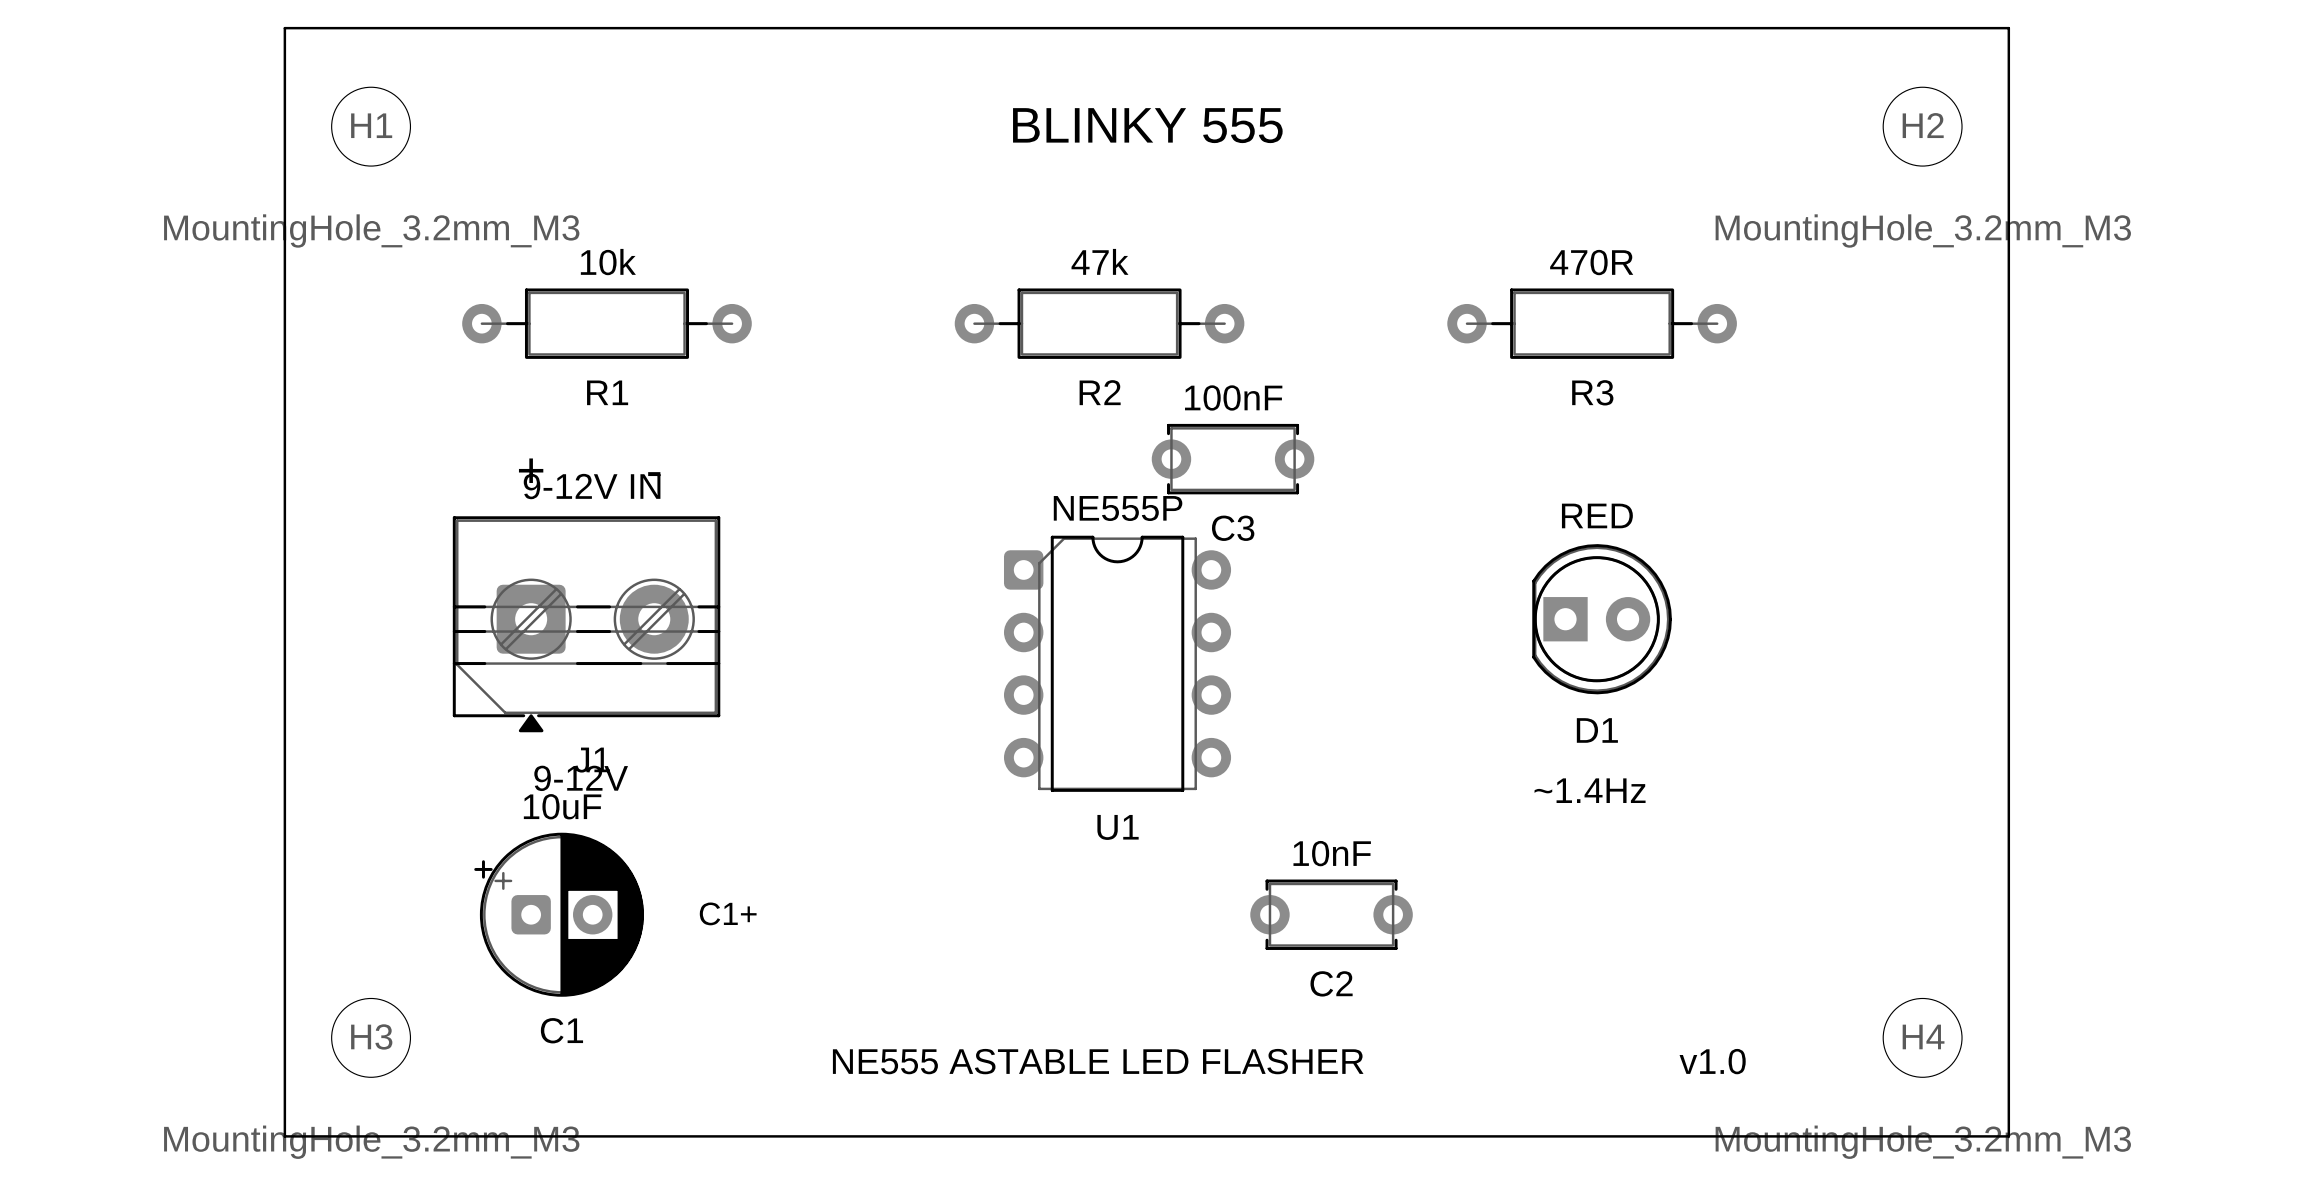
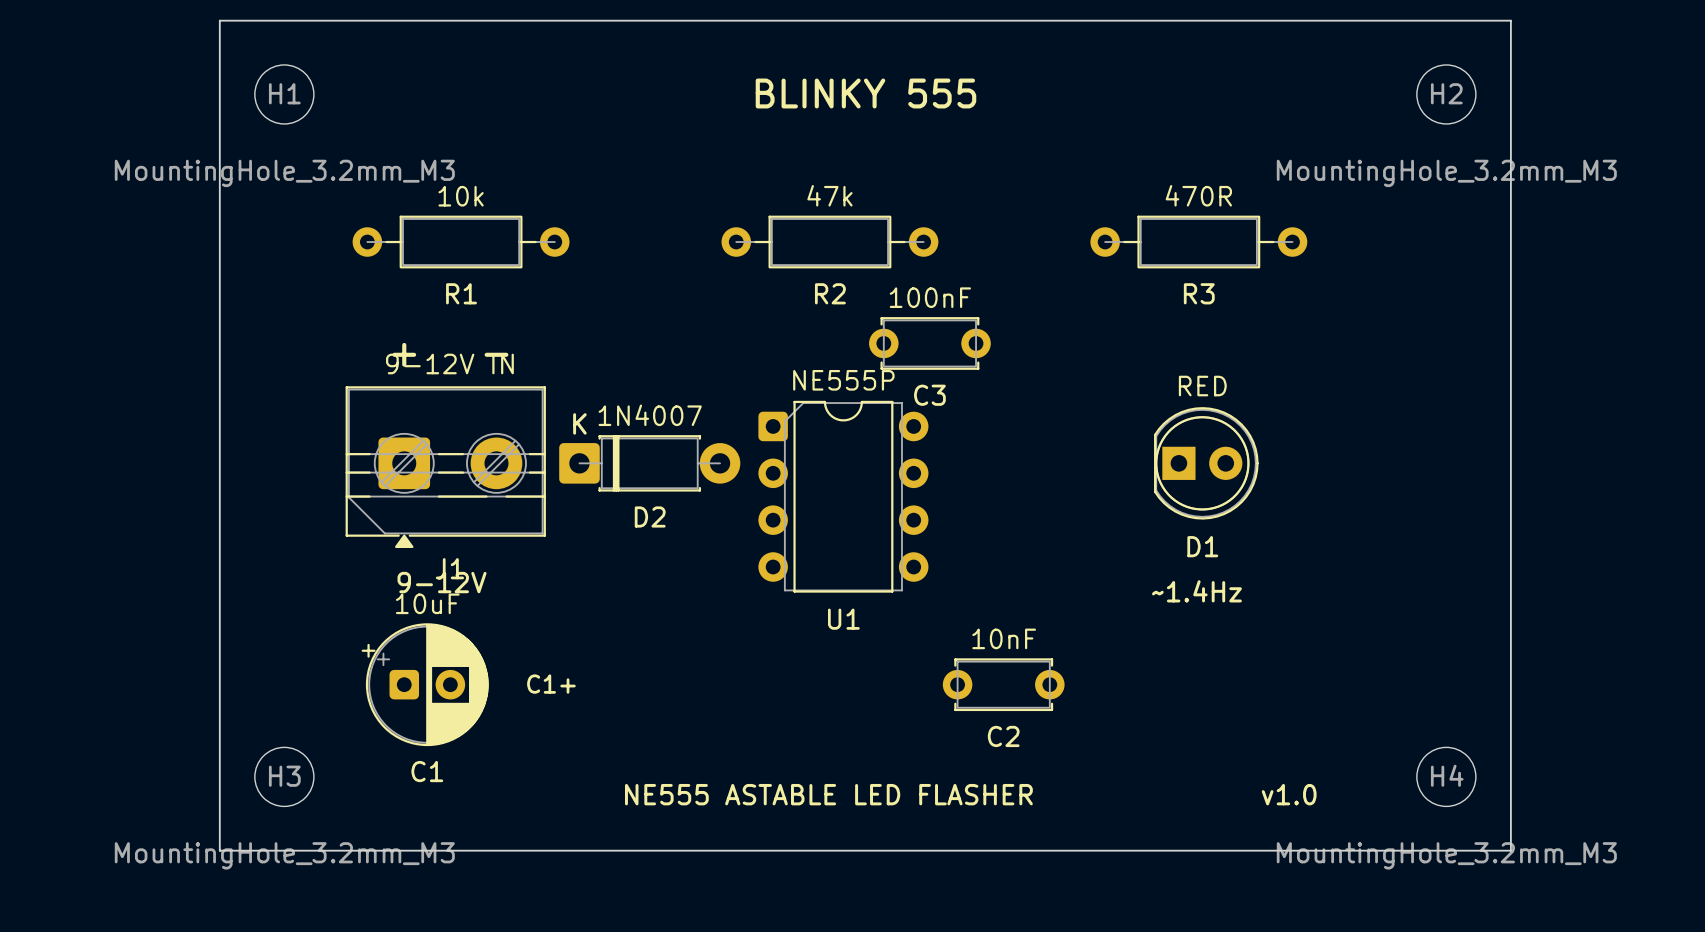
D2: none -> 1N4007 (649, 463)

